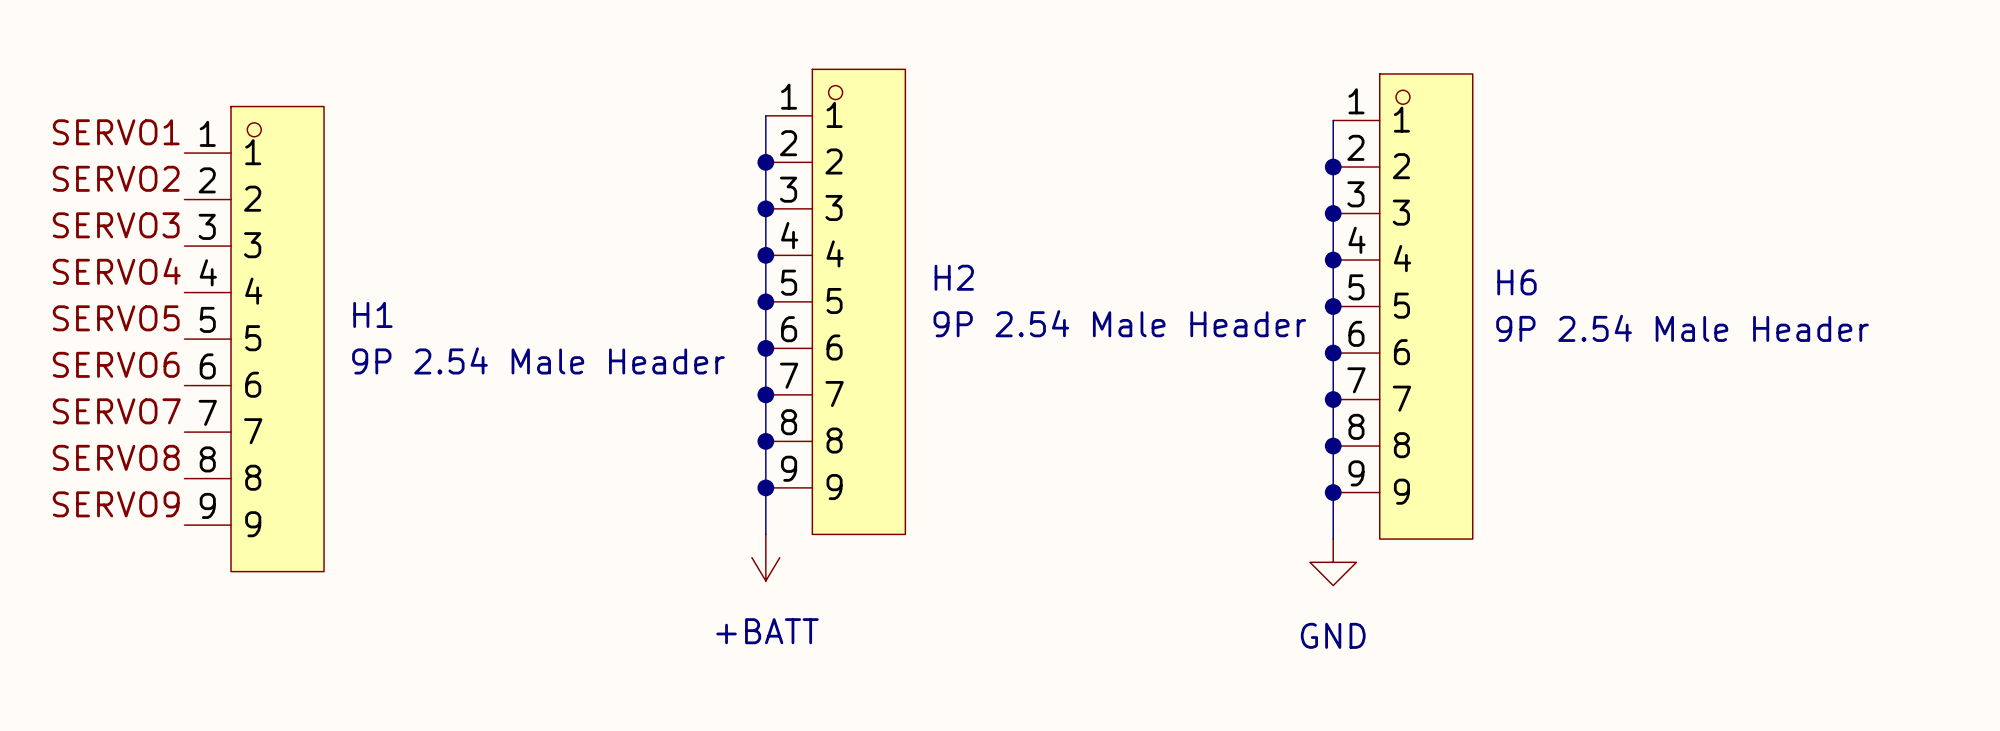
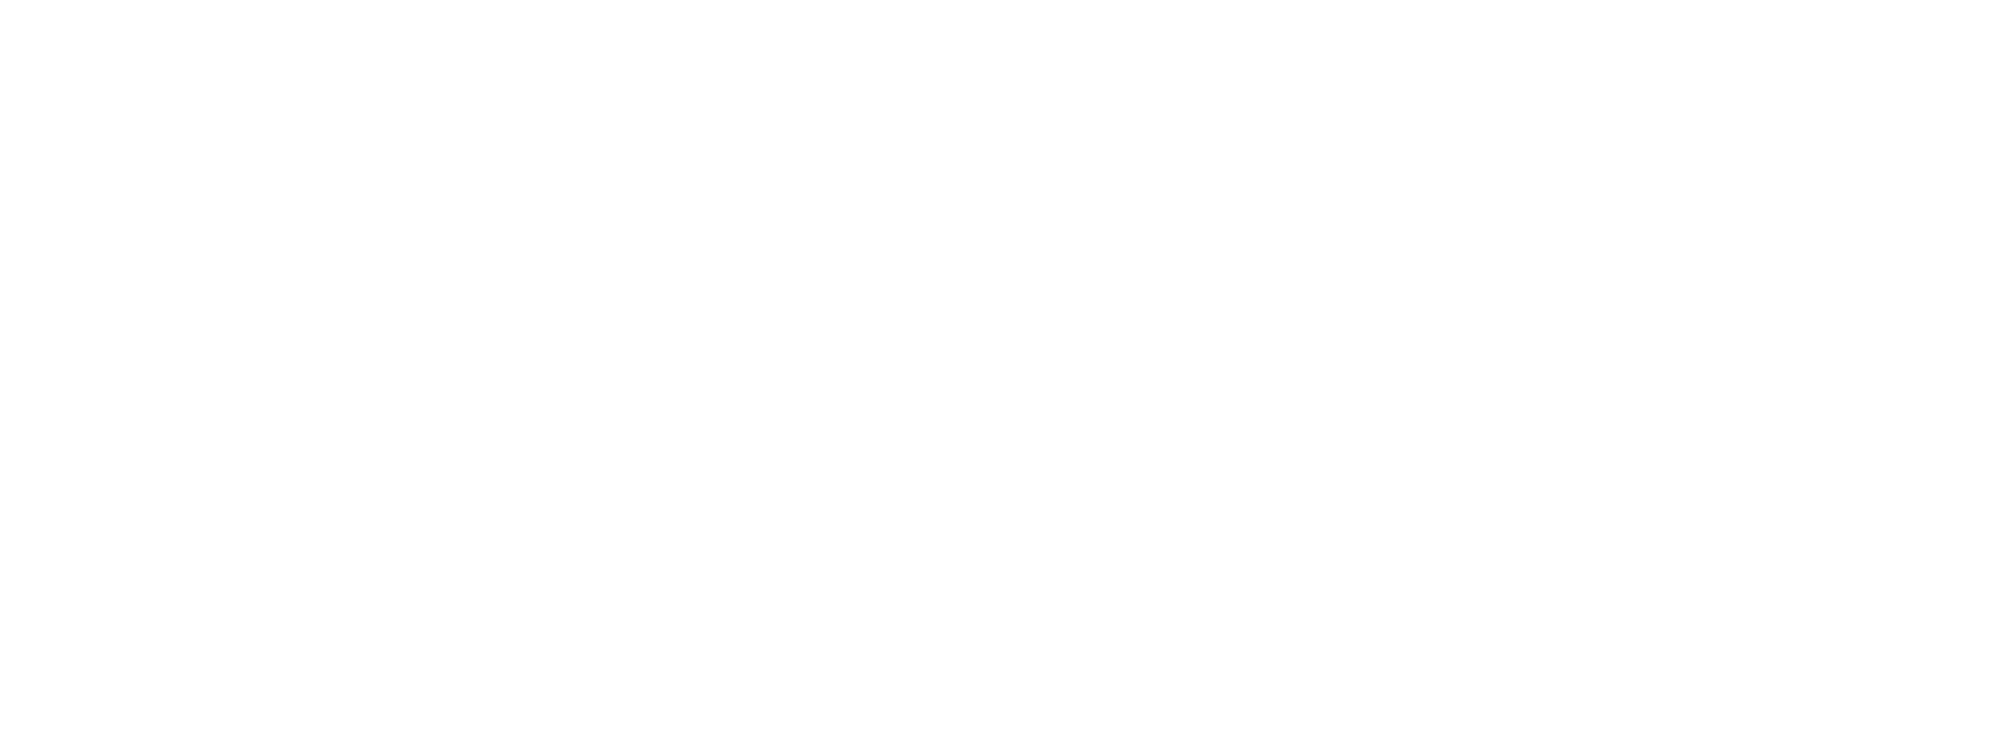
wire: (765, 115) (765, 534) -> none
wire: (1333, 120) (1333, 539) -> none
label: SERVO1 (116, 132) -> none
junction: (765, 162) -> none
junction: (1333, 167) -> none
label: SERVO2 (116, 178) -> none
junction: (765, 208) -> none
junction: (1333, 213) -> none
label: SERVO3 (116, 225) -> none
junction: (765, 255) -> none
junction: (1333, 260) -> none
label: SERVO4 (116, 271) -> none
junction: (765, 301) -> none
H2: 9P 2.54 Male Header (835, 301) -> none
junction: (1333, 306) -> none
H6: 9P 2.54 Male Header (1402, 306) -> none
label: SERVO5 (116, 318) -> none
H1: 9P 2.54 Male Header (254, 339) -> none
junction: (765, 348) -> none
junction: (1333, 353) -> none
label: SERVO6 (116, 364) -> none
junction: (765, 394) -> none
junction: (1333, 399) -> none
label: SERVO7 (116, 411) -> none
junction: (765, 441) -> none
junction: (1333, 446) -> none
label: SERVO8 (116, 457) -> none
junction: (765, 487) -> none
junction: (1333, 492) -> none
label: SERVO9 (116, 504) -> none
power symbol: +BATT (765, 557) -> none
power symbol: GND (1333, 562) -> none

